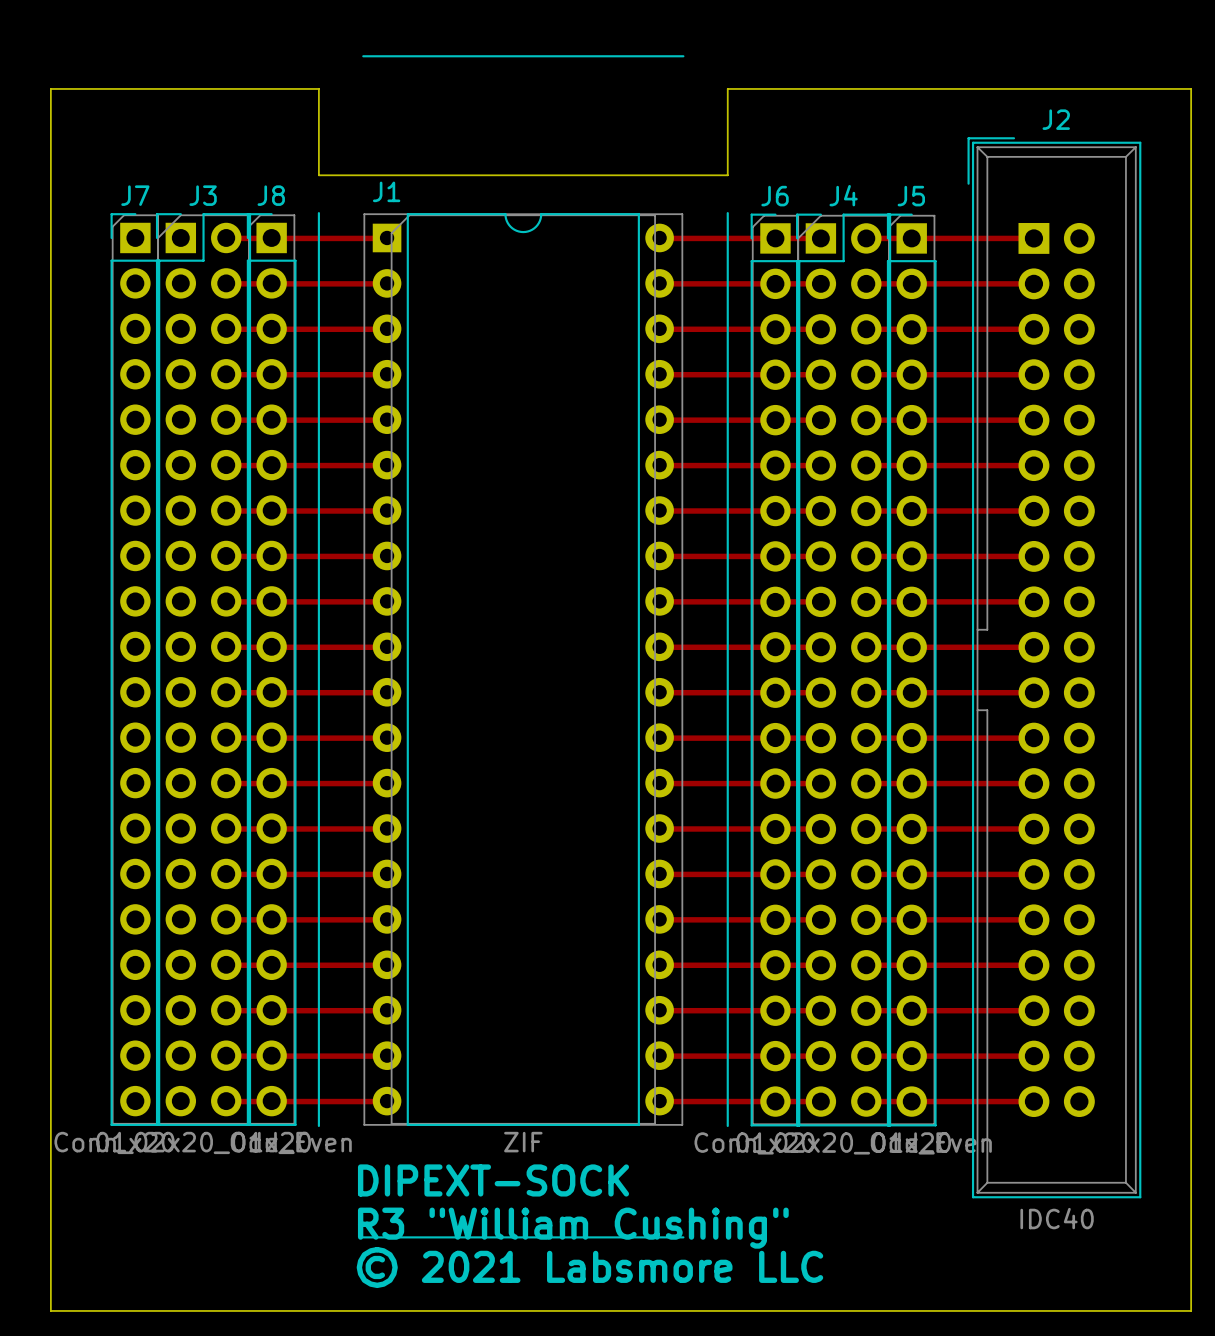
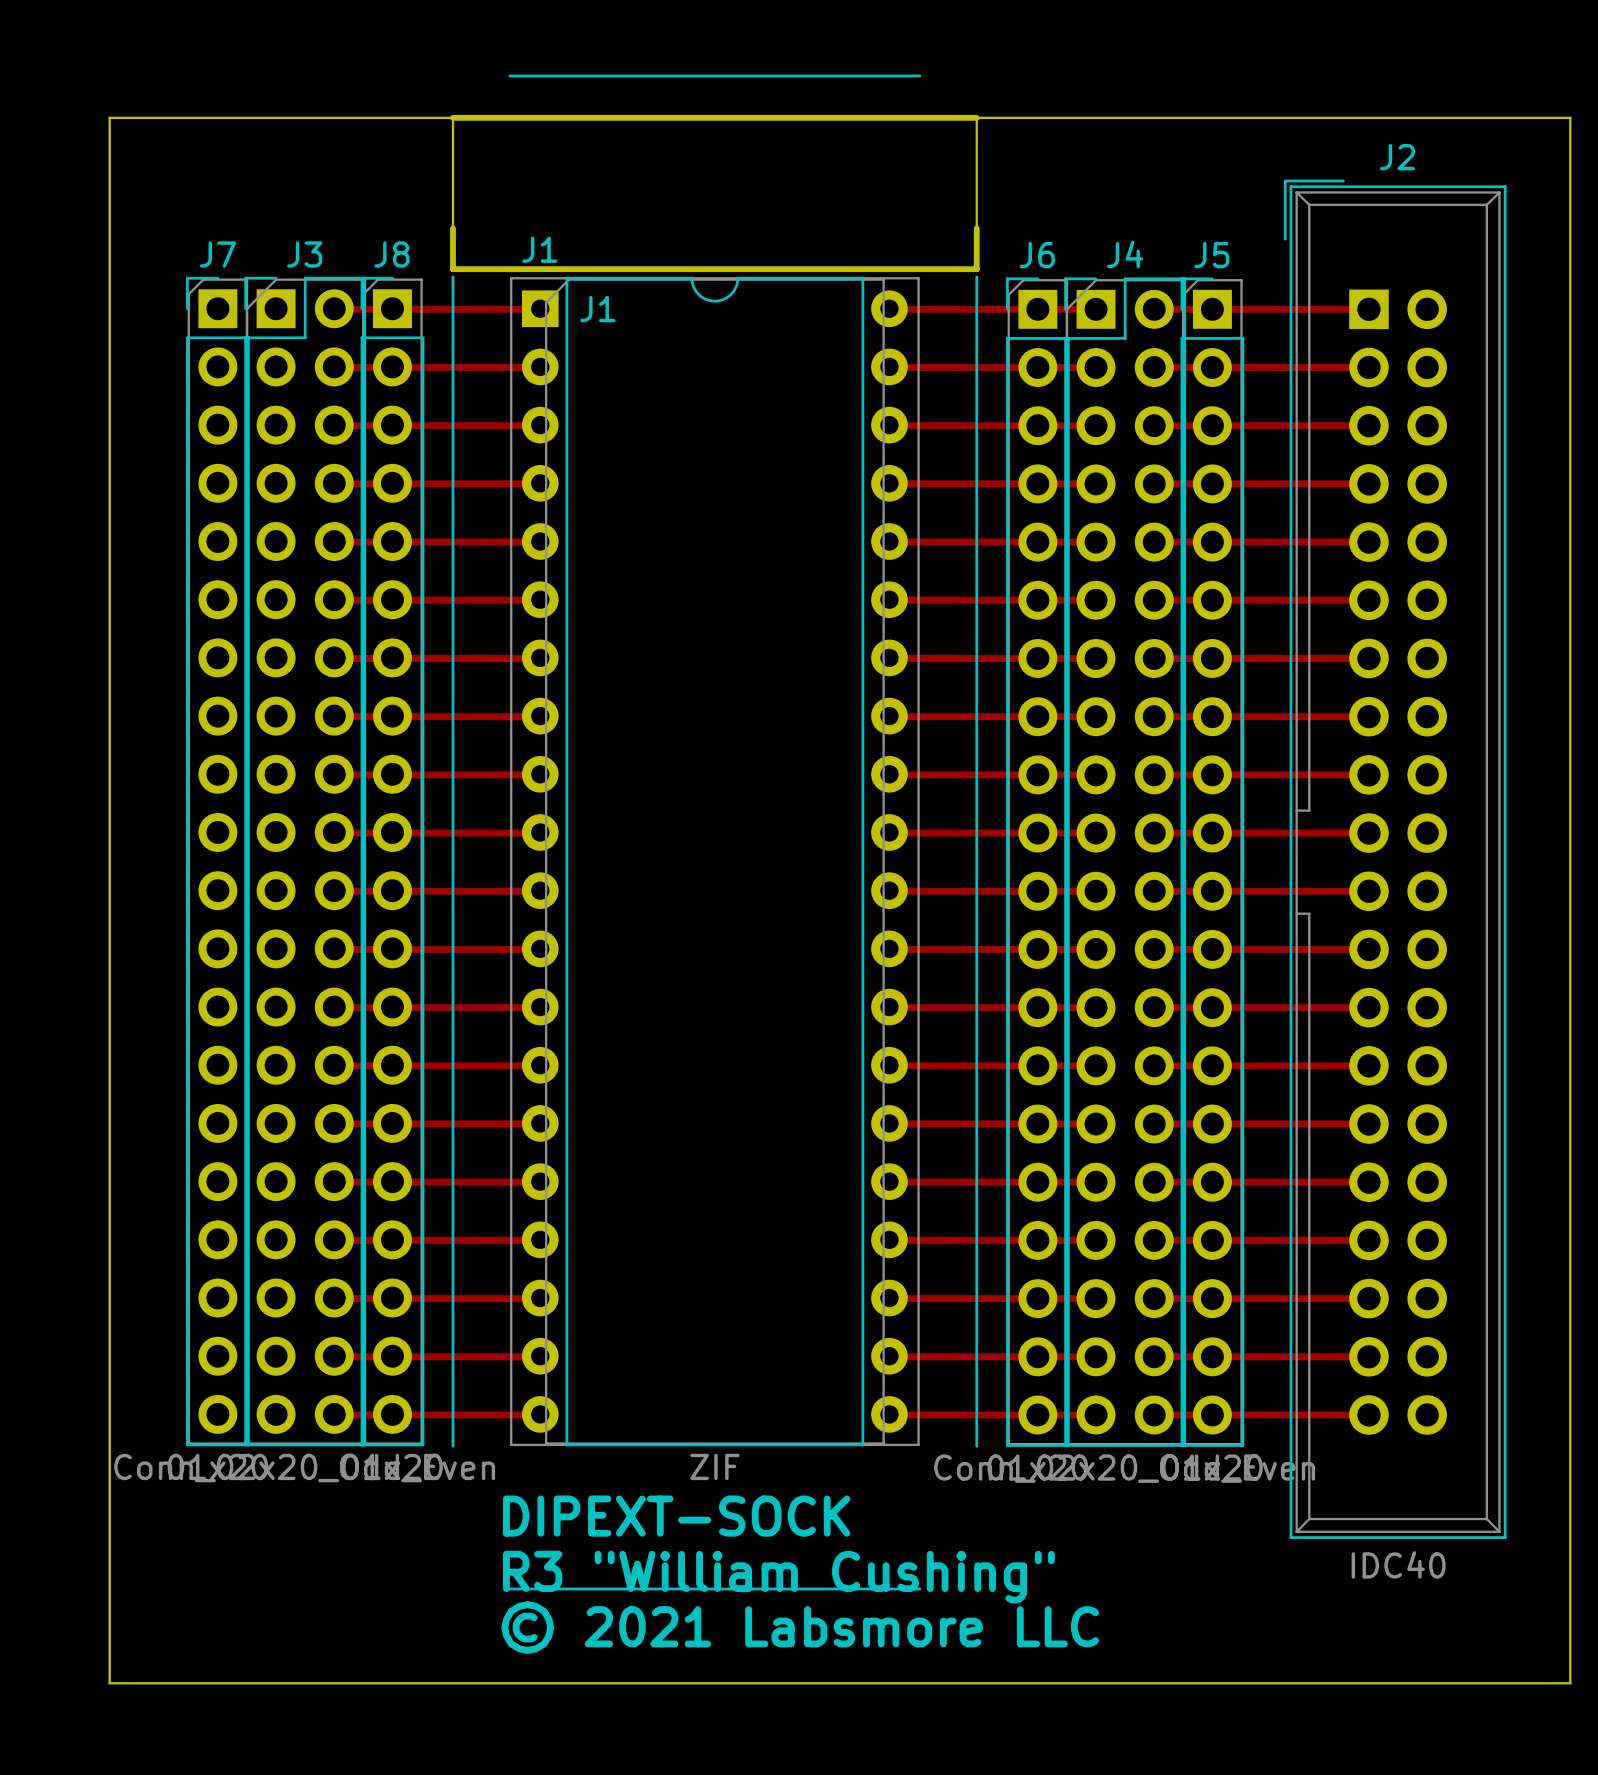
board edge: none -> (453, 117) (976, 117)
board edge: (318, 175) (727, 175) -> (453, 228) (453, 269) (976, 269) (976, 228)
text: none -> J1 (597, 309)

